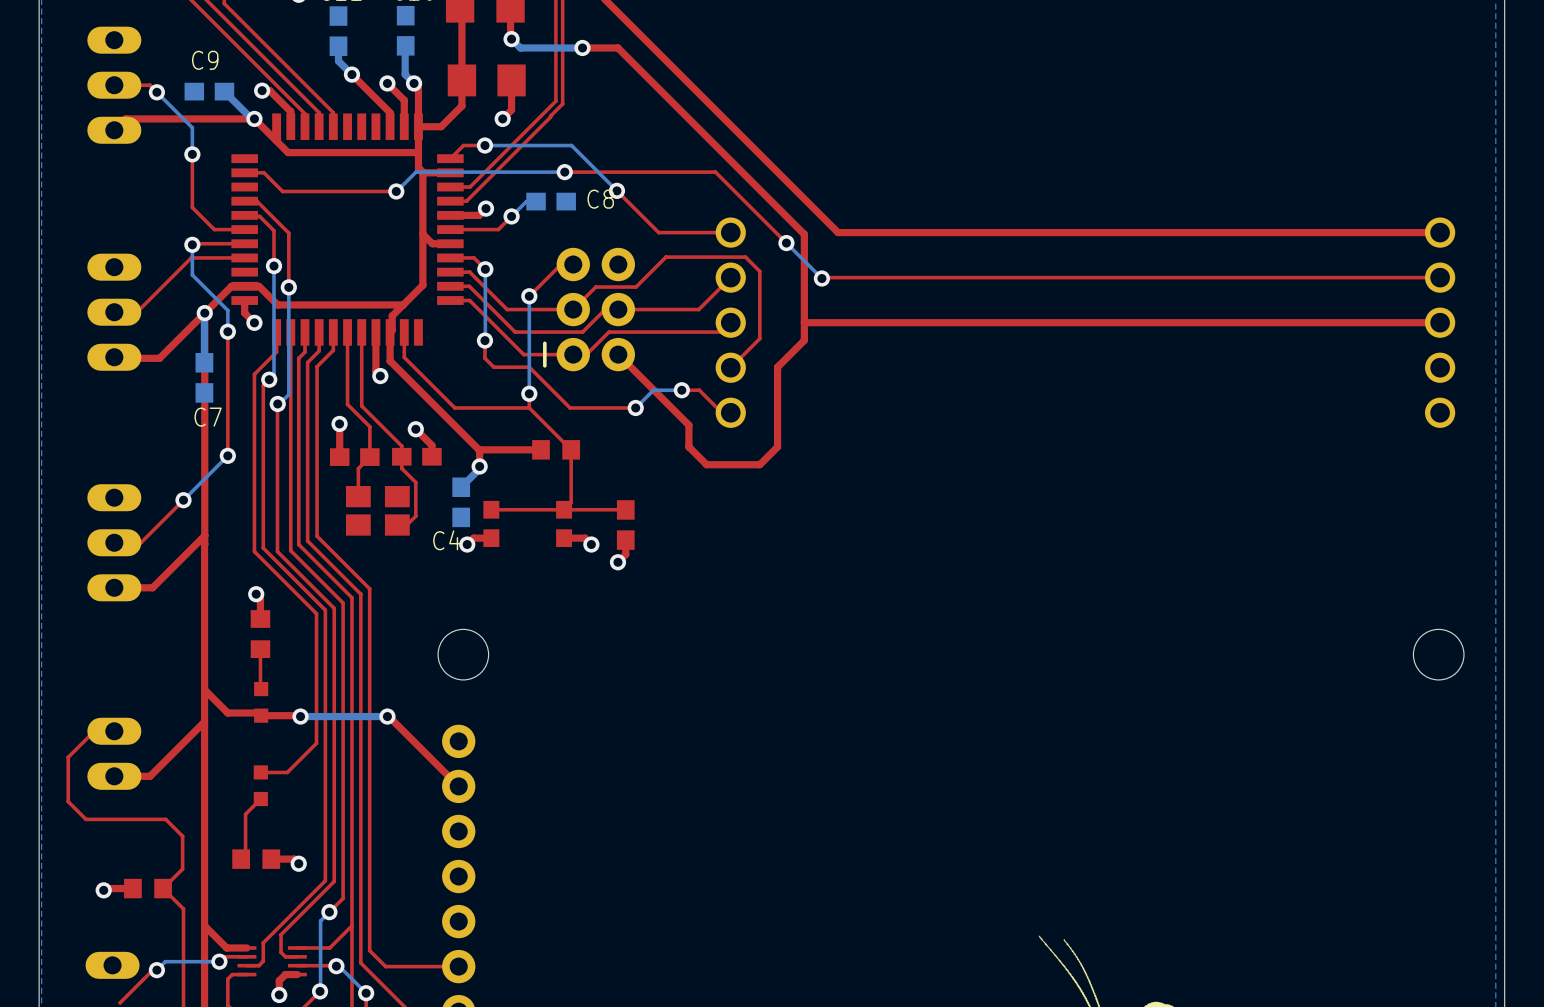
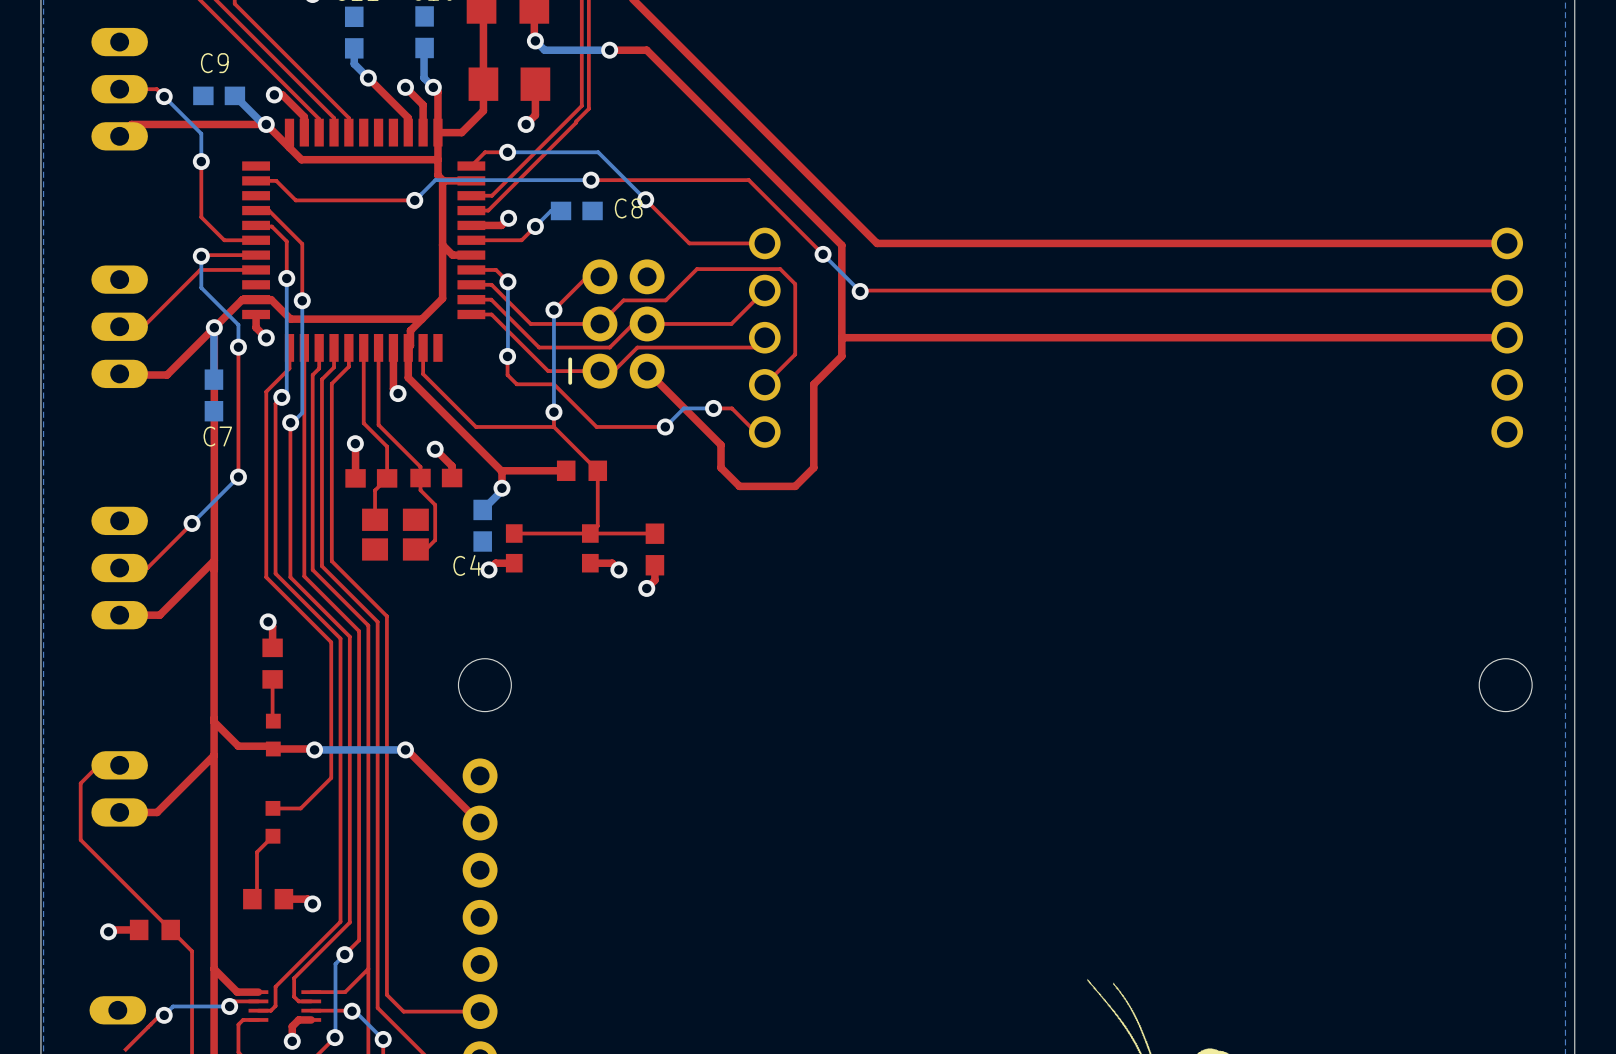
top track: (77, 748) (68, 757) (68, 801) (85, 819) (165, 819) (182, 836) (182, 869) (163, 888) -> (80, 783) (80, 839) (170, 929)

